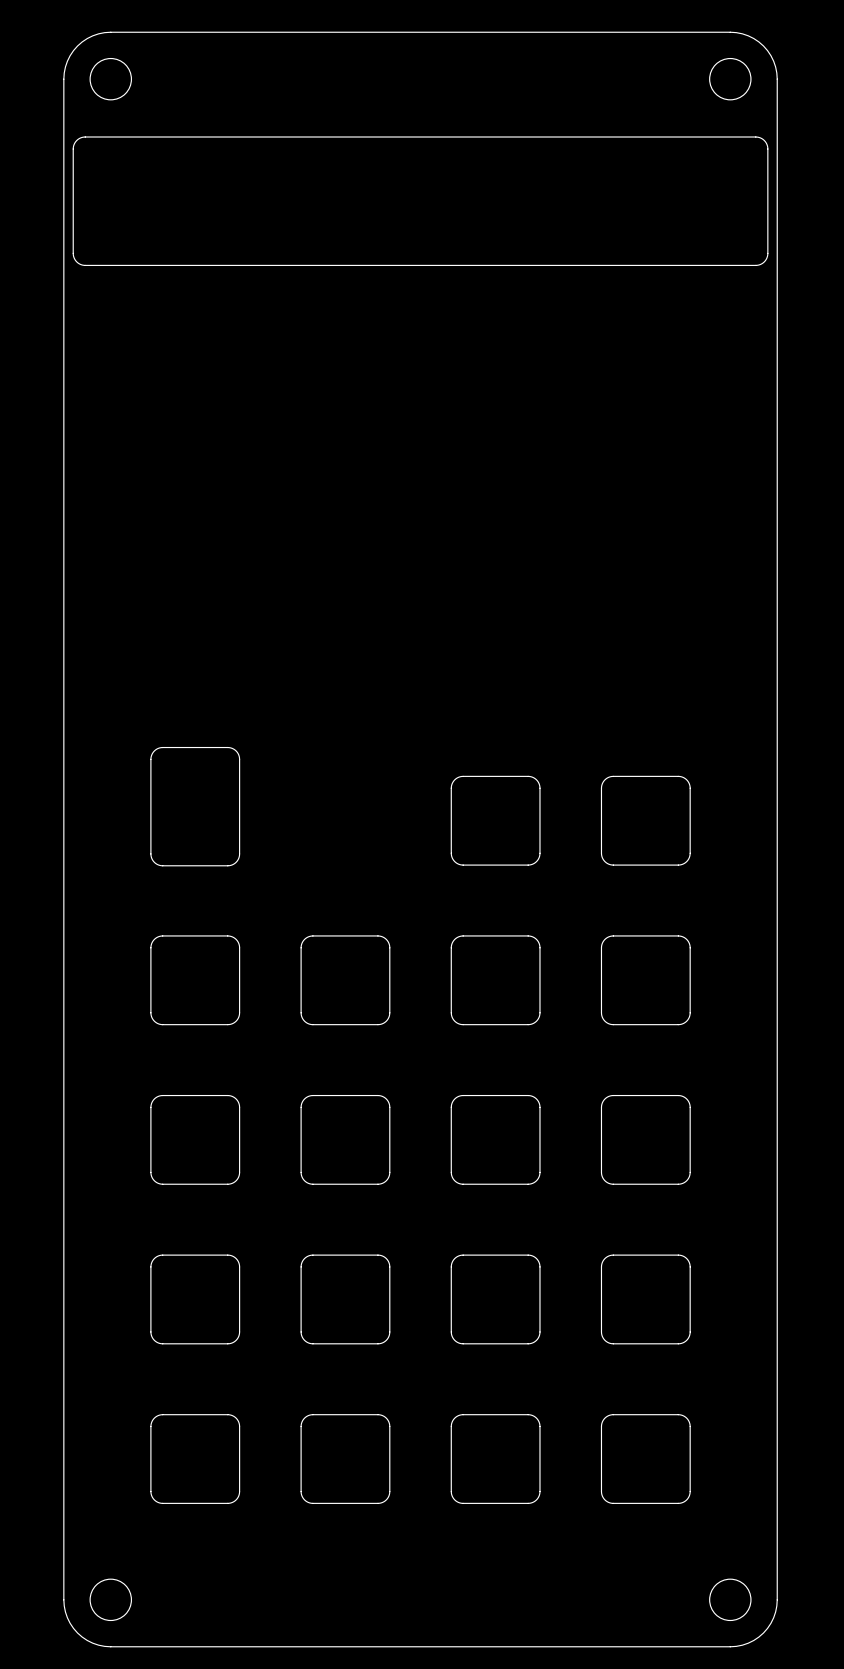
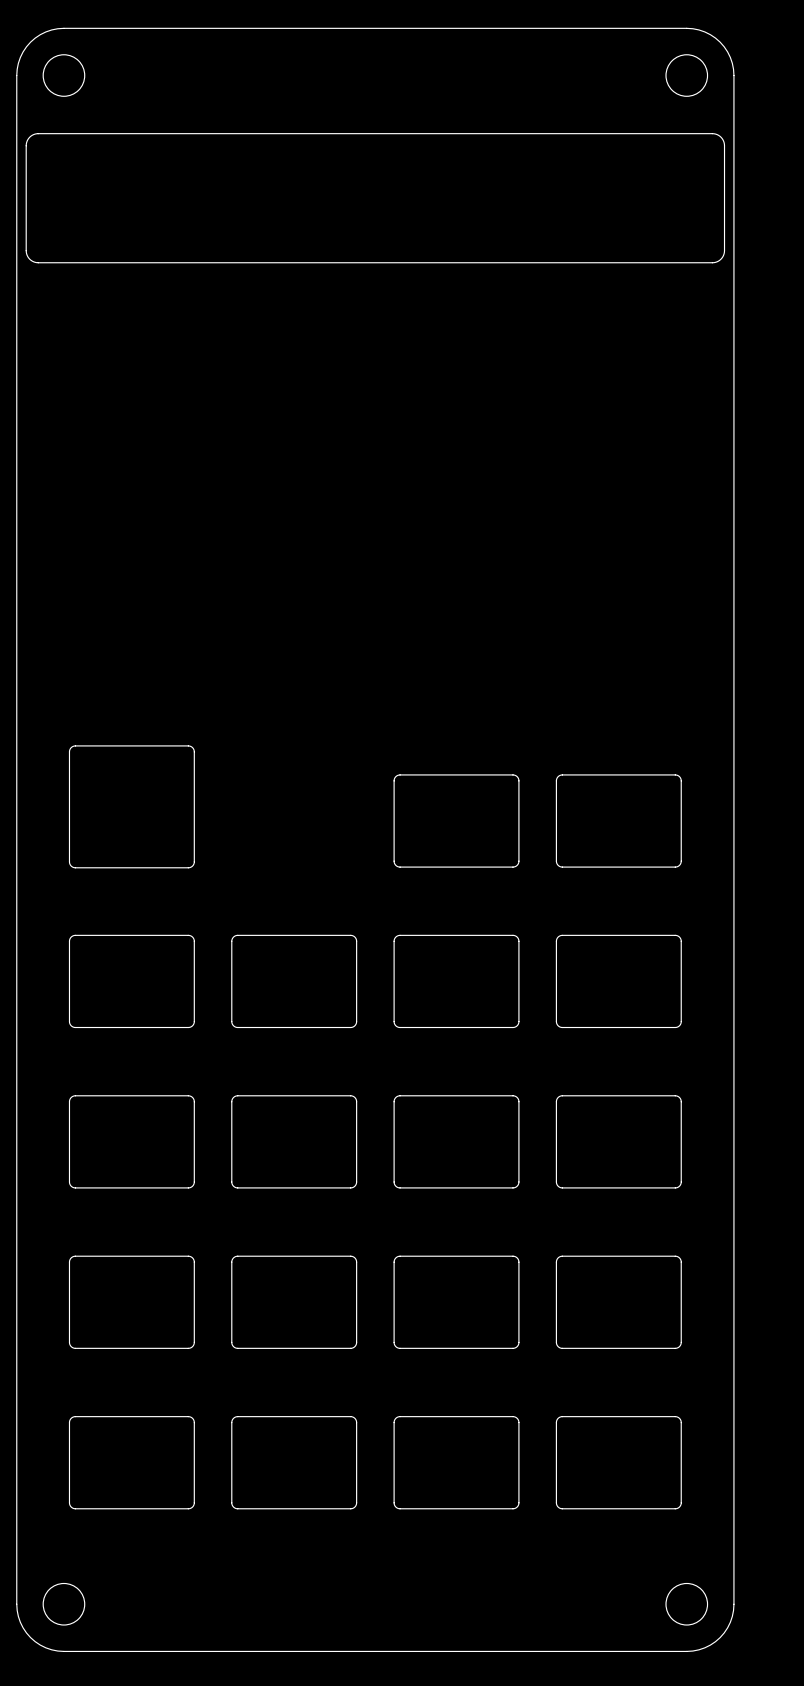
drawing: none -> [69, 745, 195, 868]
drawing: [150, 747, 240, 866] -> none
drawing: none -> [556, 774, 682, 868]
drawing shape: [451, 776, 540, 866] -> [394, 774, 519, 868]
drawing: [601, 776, 691, 866] -> none
drawing: none -> [69, 935, 195, 1028]
drawing: none -> [556, 935, 682, 1028]
drawing: [150, 935, 240, 1025] -> none
drawing shape: [301, 935, 390, 1025] -> [231, 935, 357, 1028]
drawing shape: [451, 935, 540, 1025] -> [394, 935, 519, 1028]
drawing: [601, 935, 691, 1025] -> none
drawing: none -> [69, 1095, 195, 1188]
drawing: none -> [556, 1095, 682, 1188]
drawing: [150, 1095, 240, 1185] -> none
drawing shape: [301, 1095, 390, 1185] -> [231, 1095, 357, 1188]
drawing shape: [451, 1095, 540, 1185] -> [394, 1095, 519, 1188]
drawing: [601, 1095, 691, 1185] -> none
drawing: none -> [69, 1256, 195, 1349]
drawing: none -> [556, 1256, 682, 1349]
drawing: [150, 1255, 240, 1344] -> none
drawing shape: [301, 1255, 390, 1344] -> [231, 1256, 357, 1349]
drawing shape: [451, 1255, 540, 1344] -> [394, 1256, 519, 1349]
drawing: [601, 1255, 691, 1344] -> none
drawing: none -> [69, 1416, 195, 1509]
drawing: none -> [556, 1416, 682, 1509]
drawing: [150, 1414, 240, 1504] -> none
drawing shape: [301, 1414, 390, 1504] -> [231, 1416, 357, 1509]
drawing shape: [451, 1414, 540, 1504] -> [394, 1416, 519, 1509]
drawing: [601, 1414, 691, 1504] -> none

